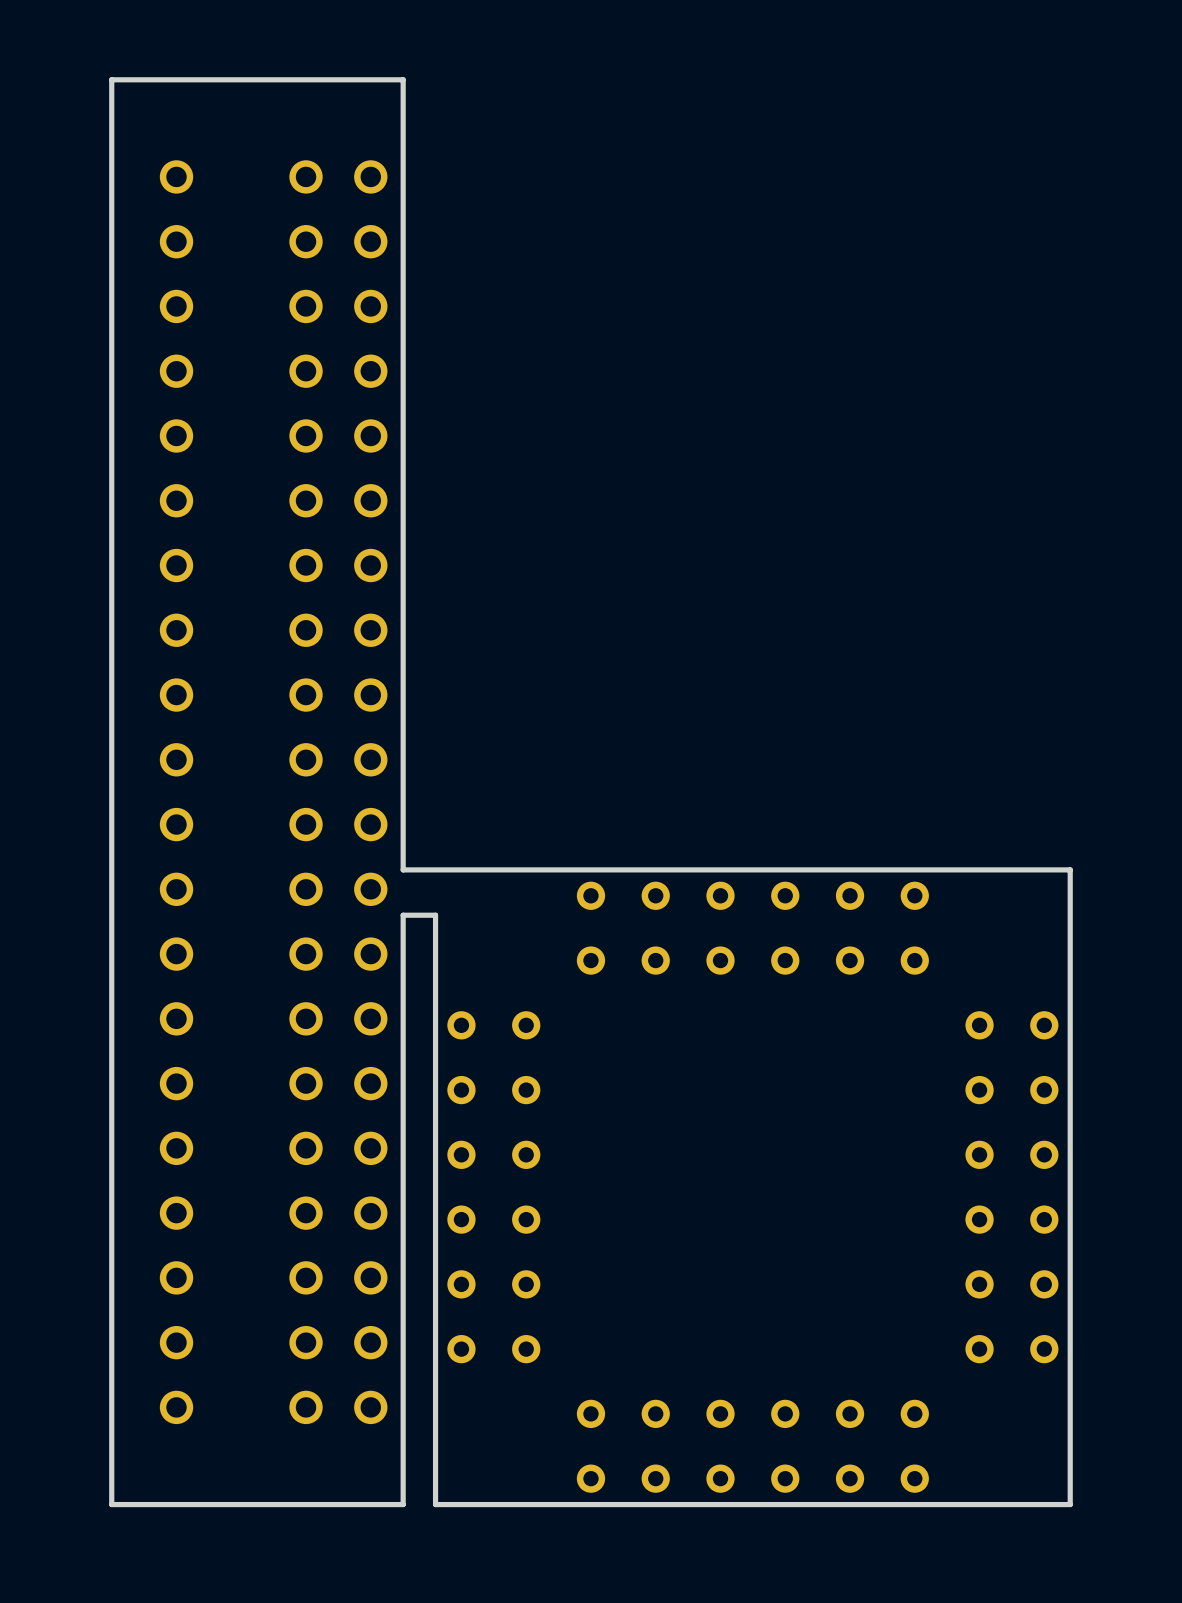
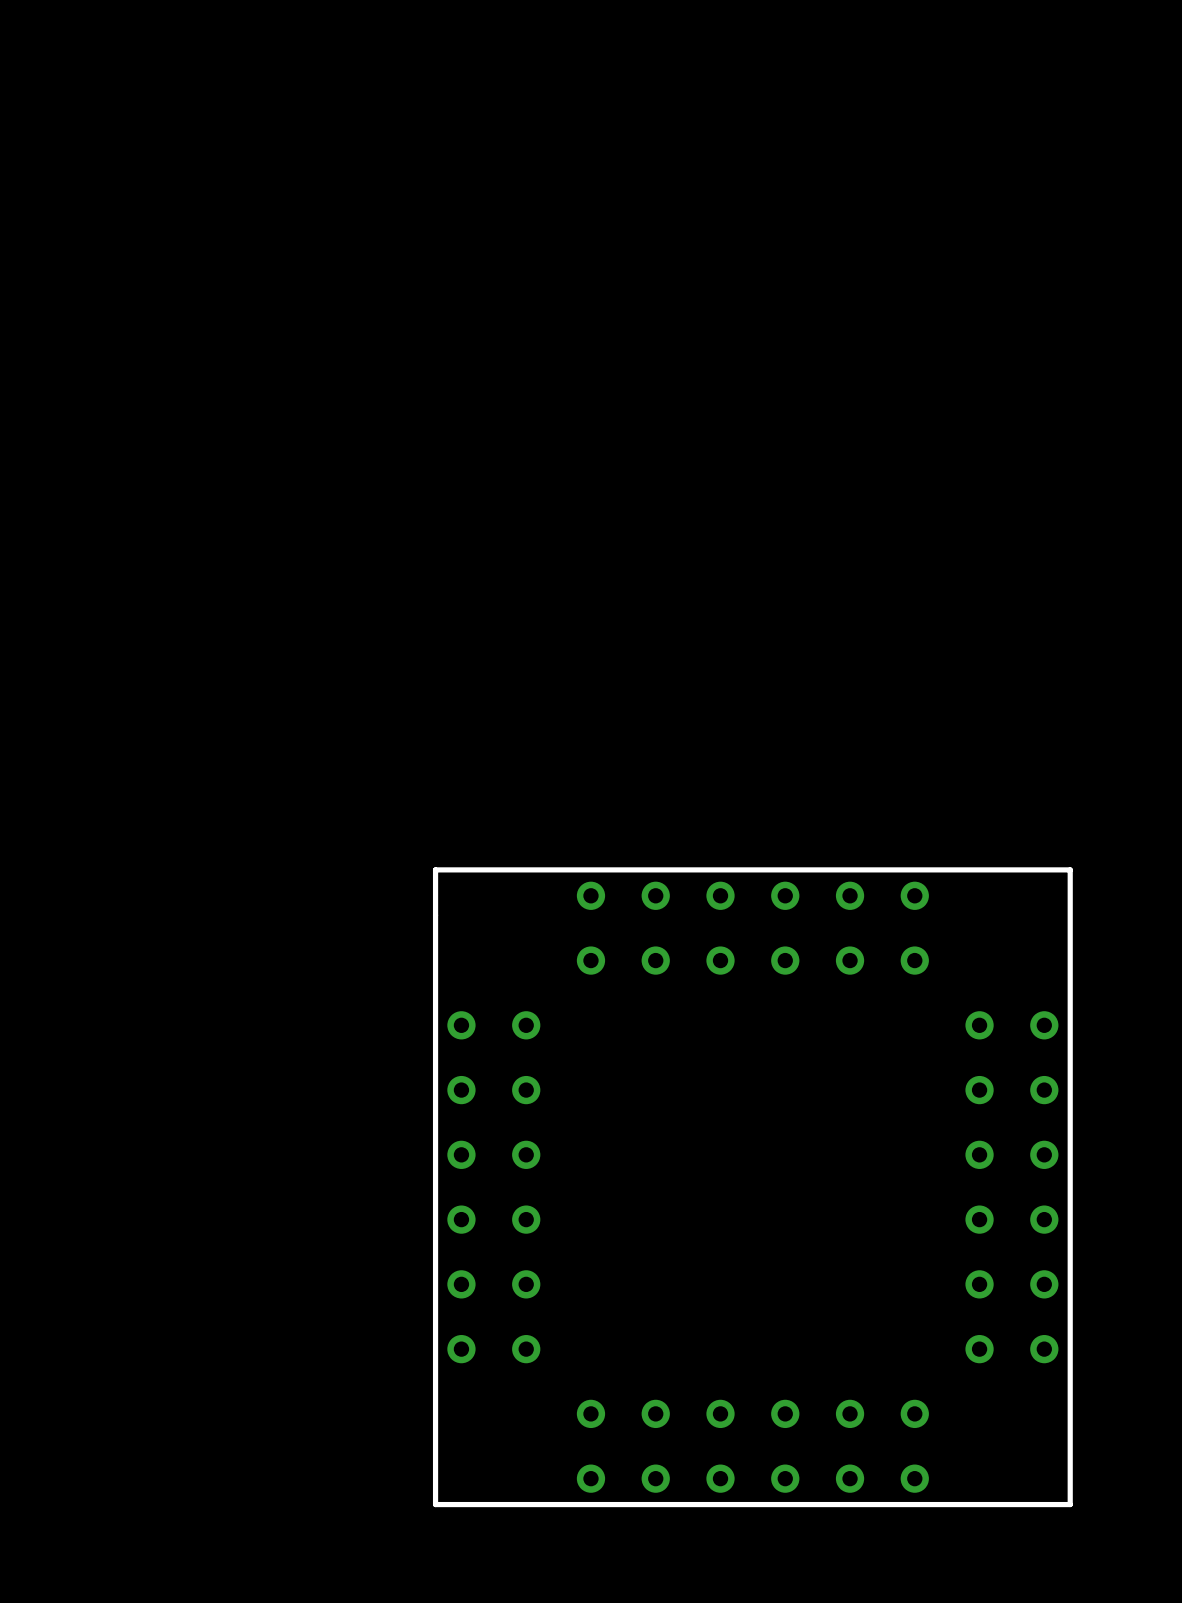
part: (176, 792) -> none
part: (306, 792) -> none
part: (370, 792) -> none
board edge: (435, 869) (403, 869) (403, 79) (111, 79) (111, 1504) (403, 1504) (403, 915) (435, 915) -> (435, 869) (435, 915)

